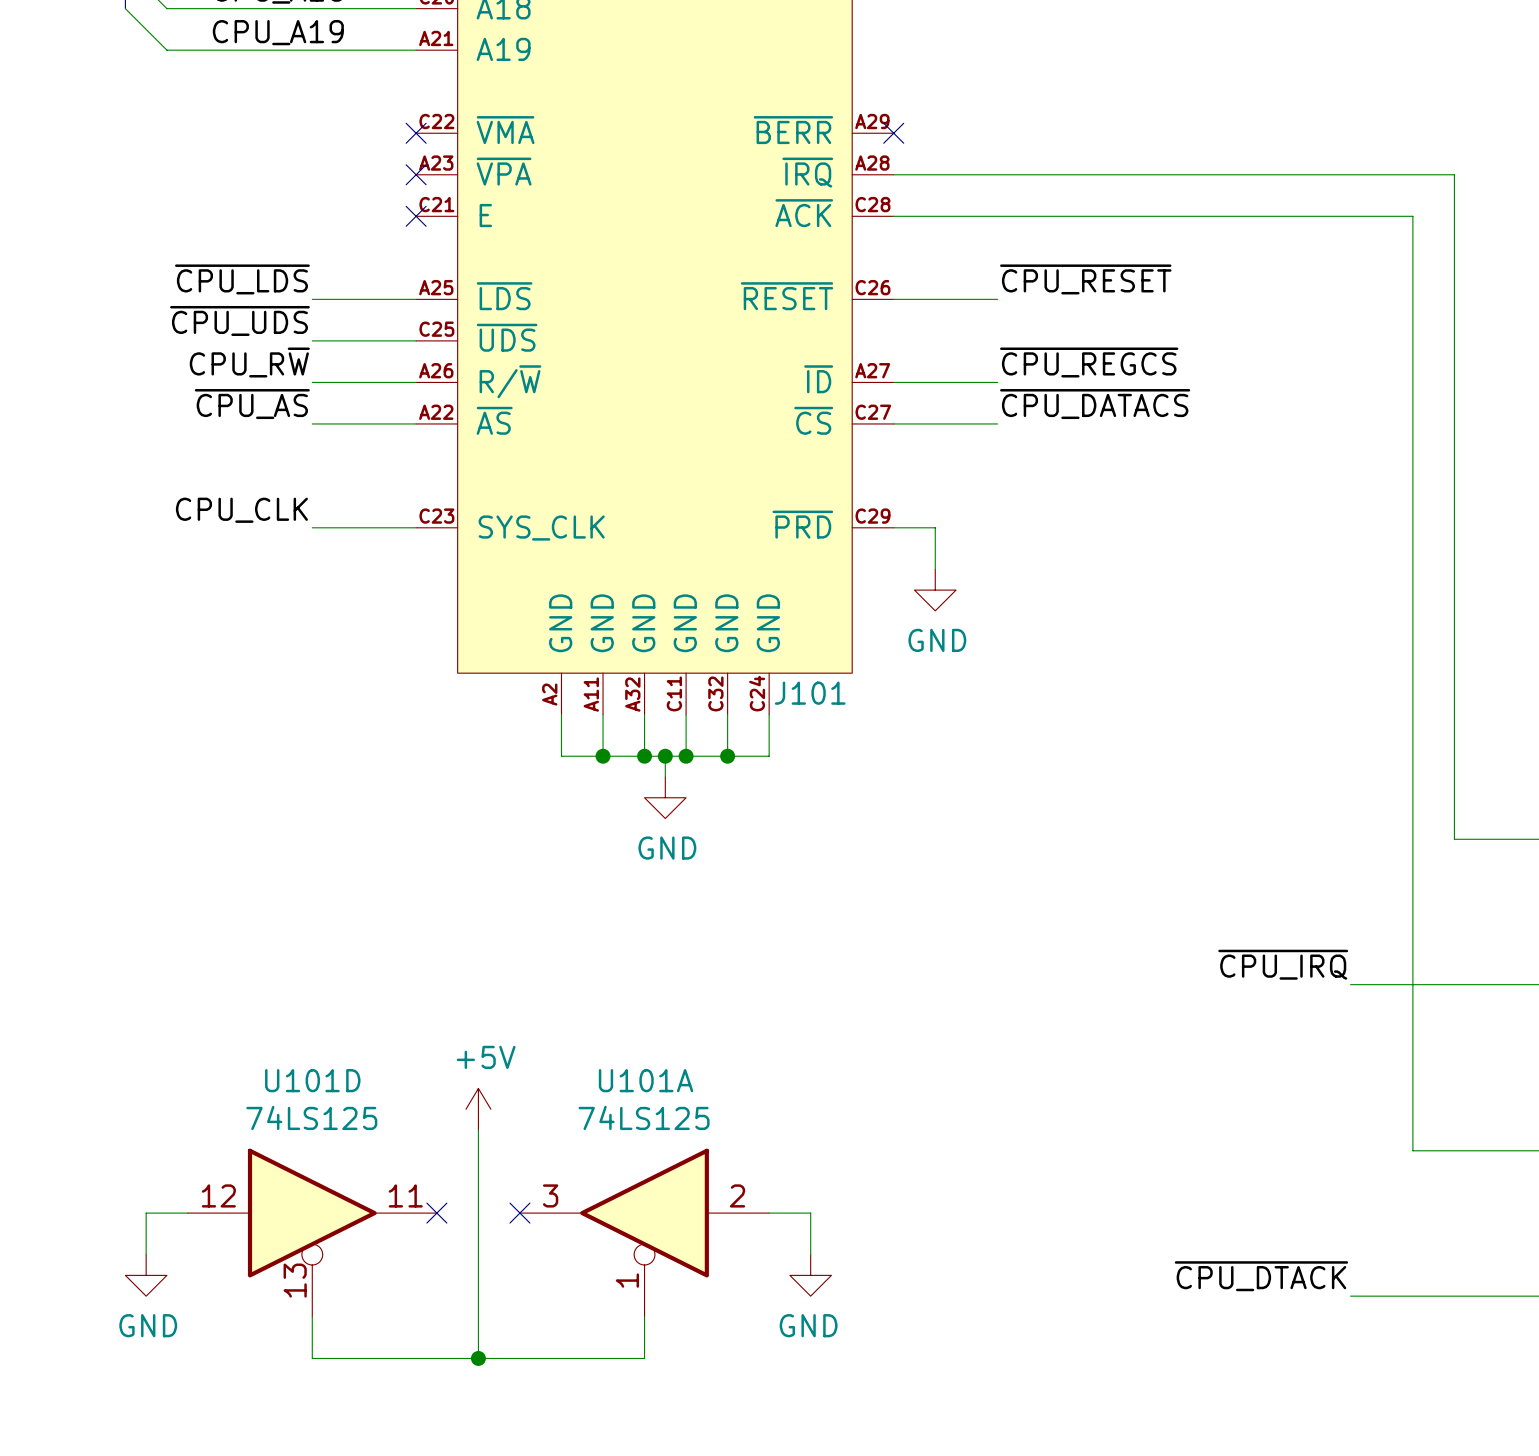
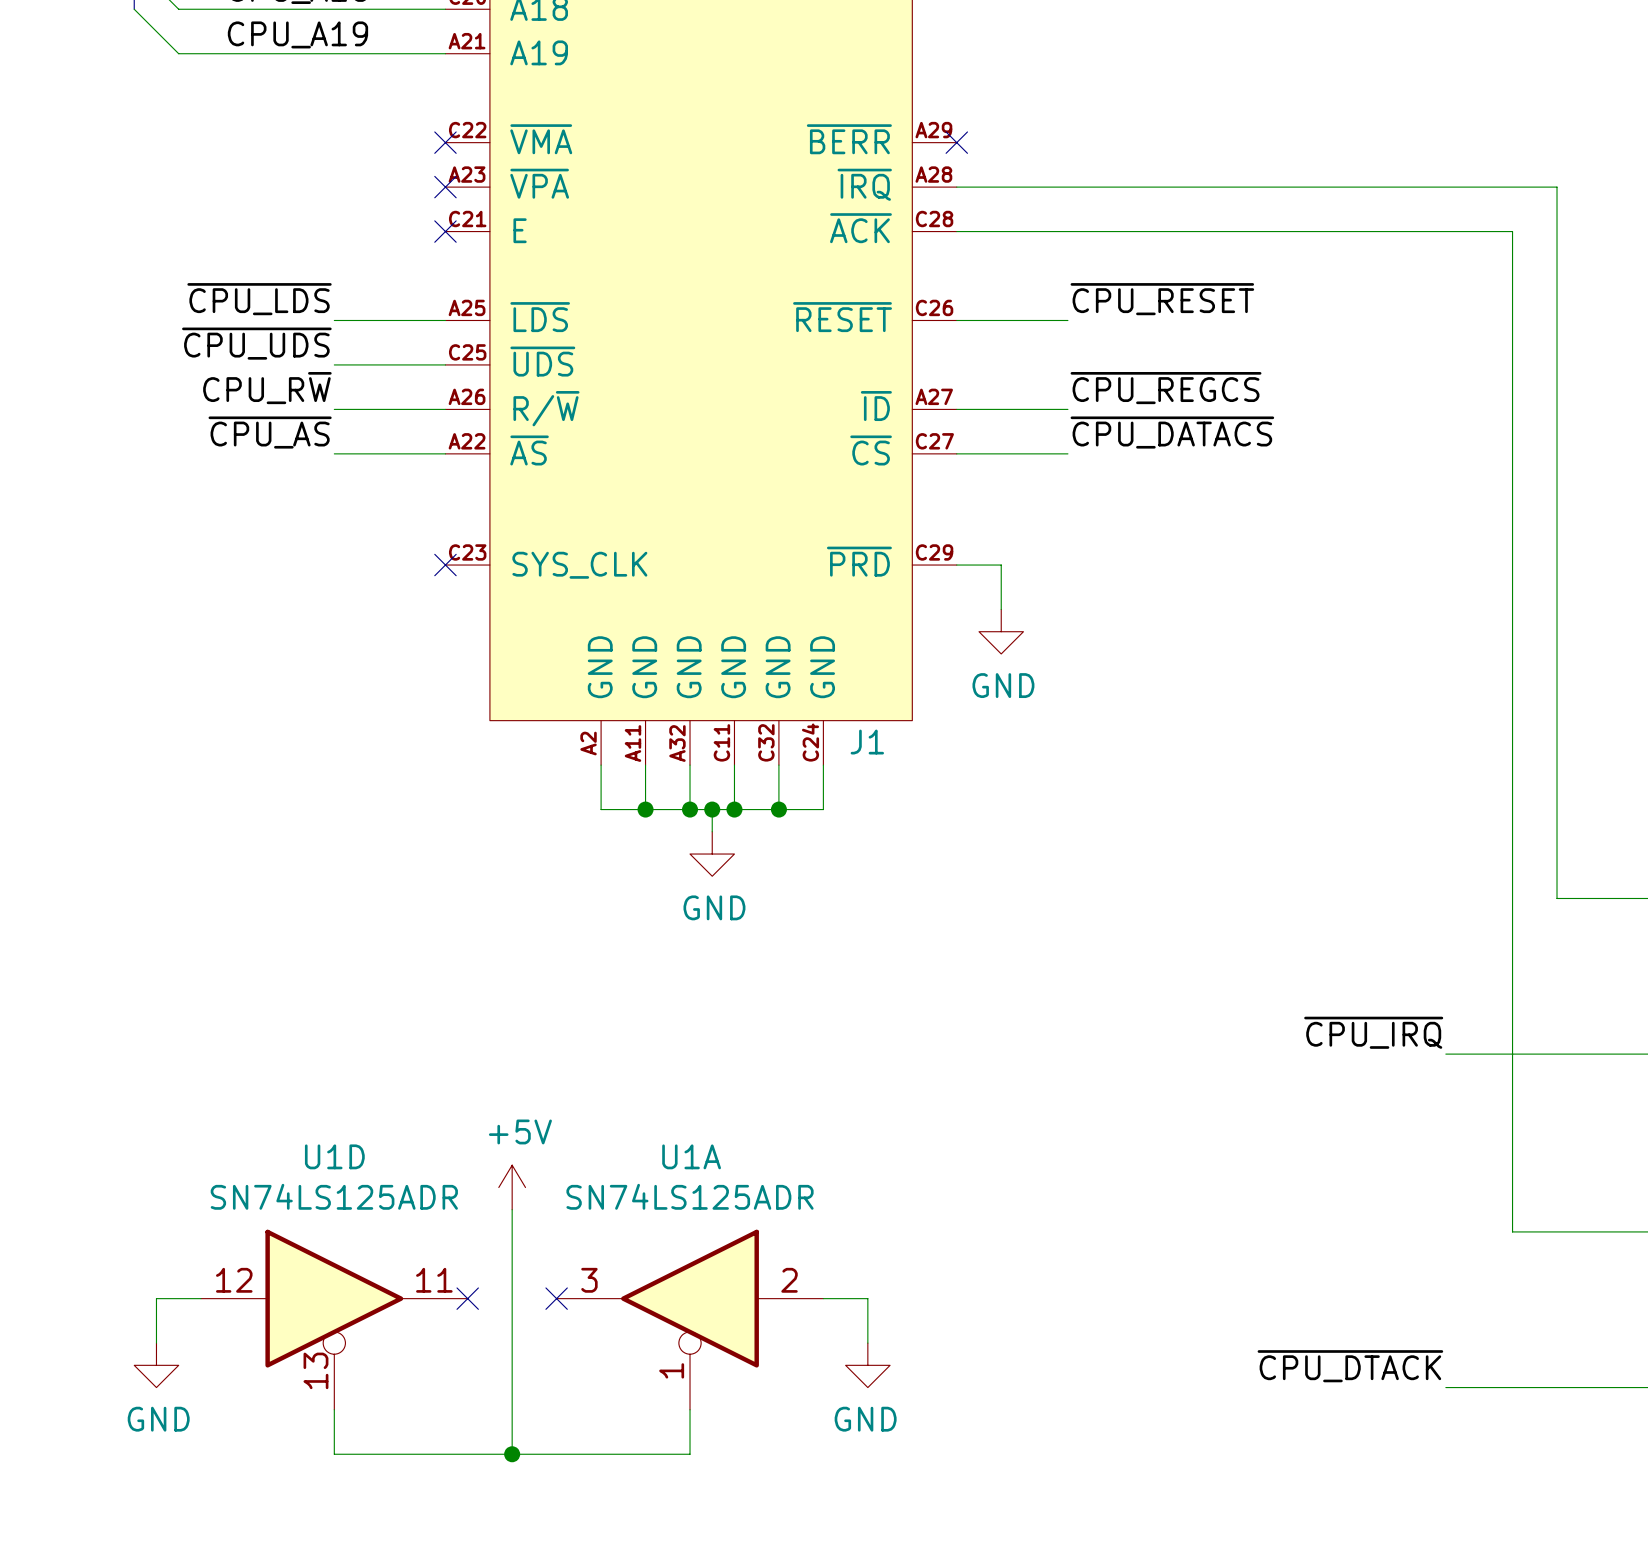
label: CPU_CLK (241, 510) -> none
wire: (312, 527) (416, 527) -> none
no-connect mark: none -> (445, 565)
J101 name: J101 (810, 693) -> J1 (867, 742)
U101D name: U101D (312, 1080) -> U1D (334, 1156)
U101A name: U101A (646, 1080) -> U1A (691, 1156)
U101D value: 74LS125 (311, 1117) -> SN74LS125ADR (334, 1196)
U101A value: 74LS125 (644, 1117) -> SN74LS125ADR (690, 1196)

